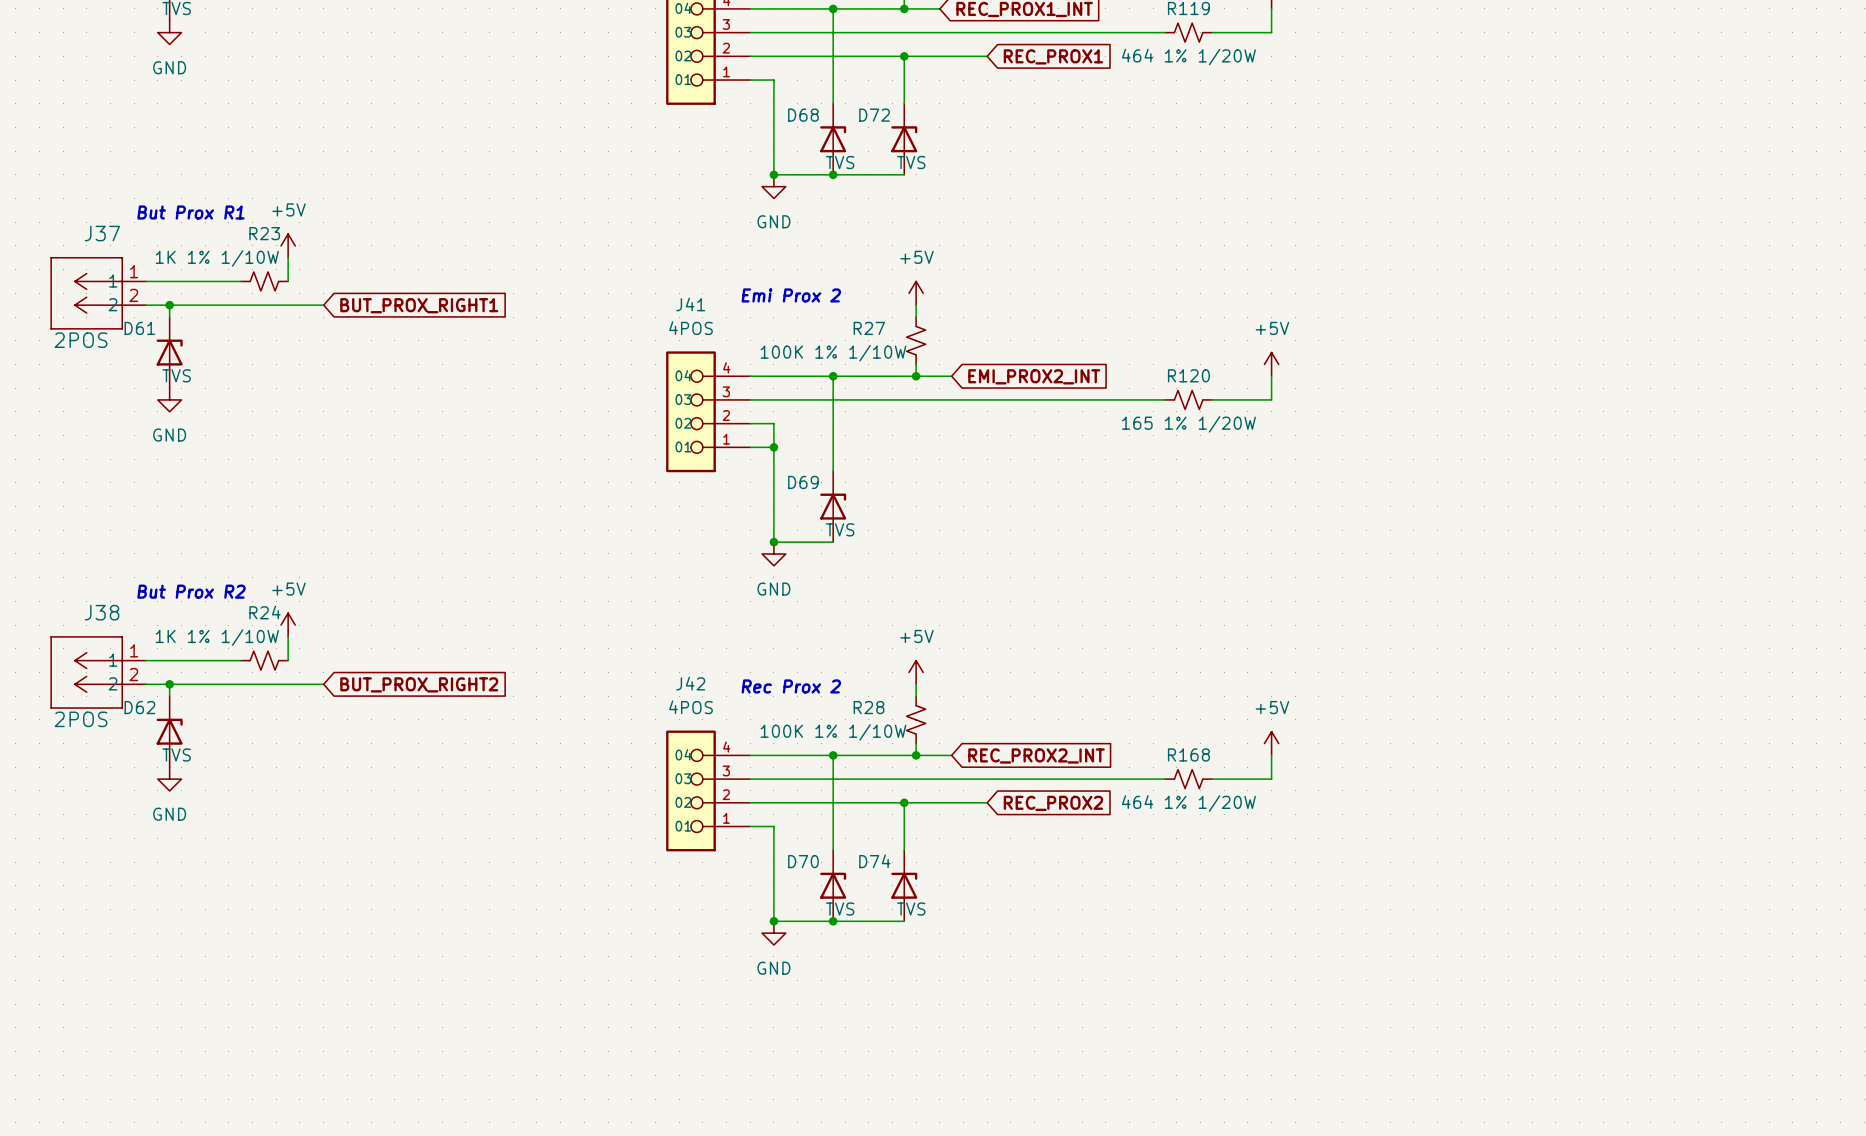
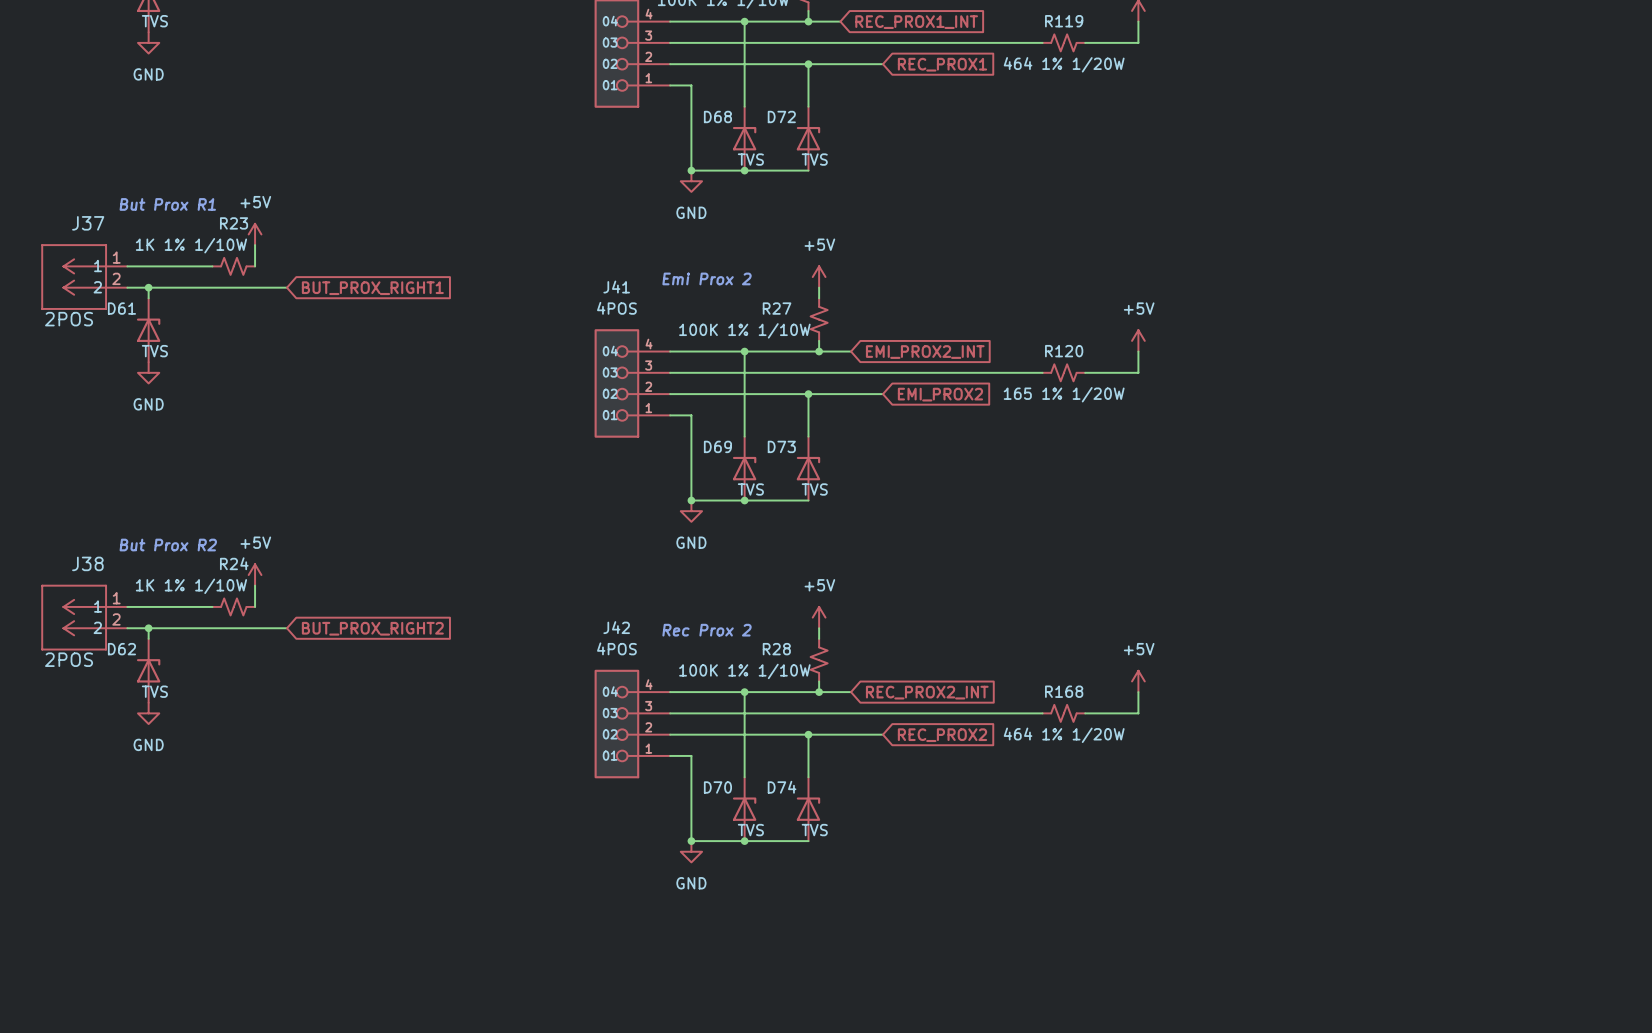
wire: (773, 423) (773, 447) -> (691, 394) (882, 394)
wire: none -> (808, 394) (808, 436)
junction: none -> (808, 394)
global label: none -> EMI_PROX2 (940, 394)
junction: (773, 447) -> none
D73: none -> TVS (808, 468)
wire: none -> (744, 500) (808, 500)
junction: none -> (744, 500)

